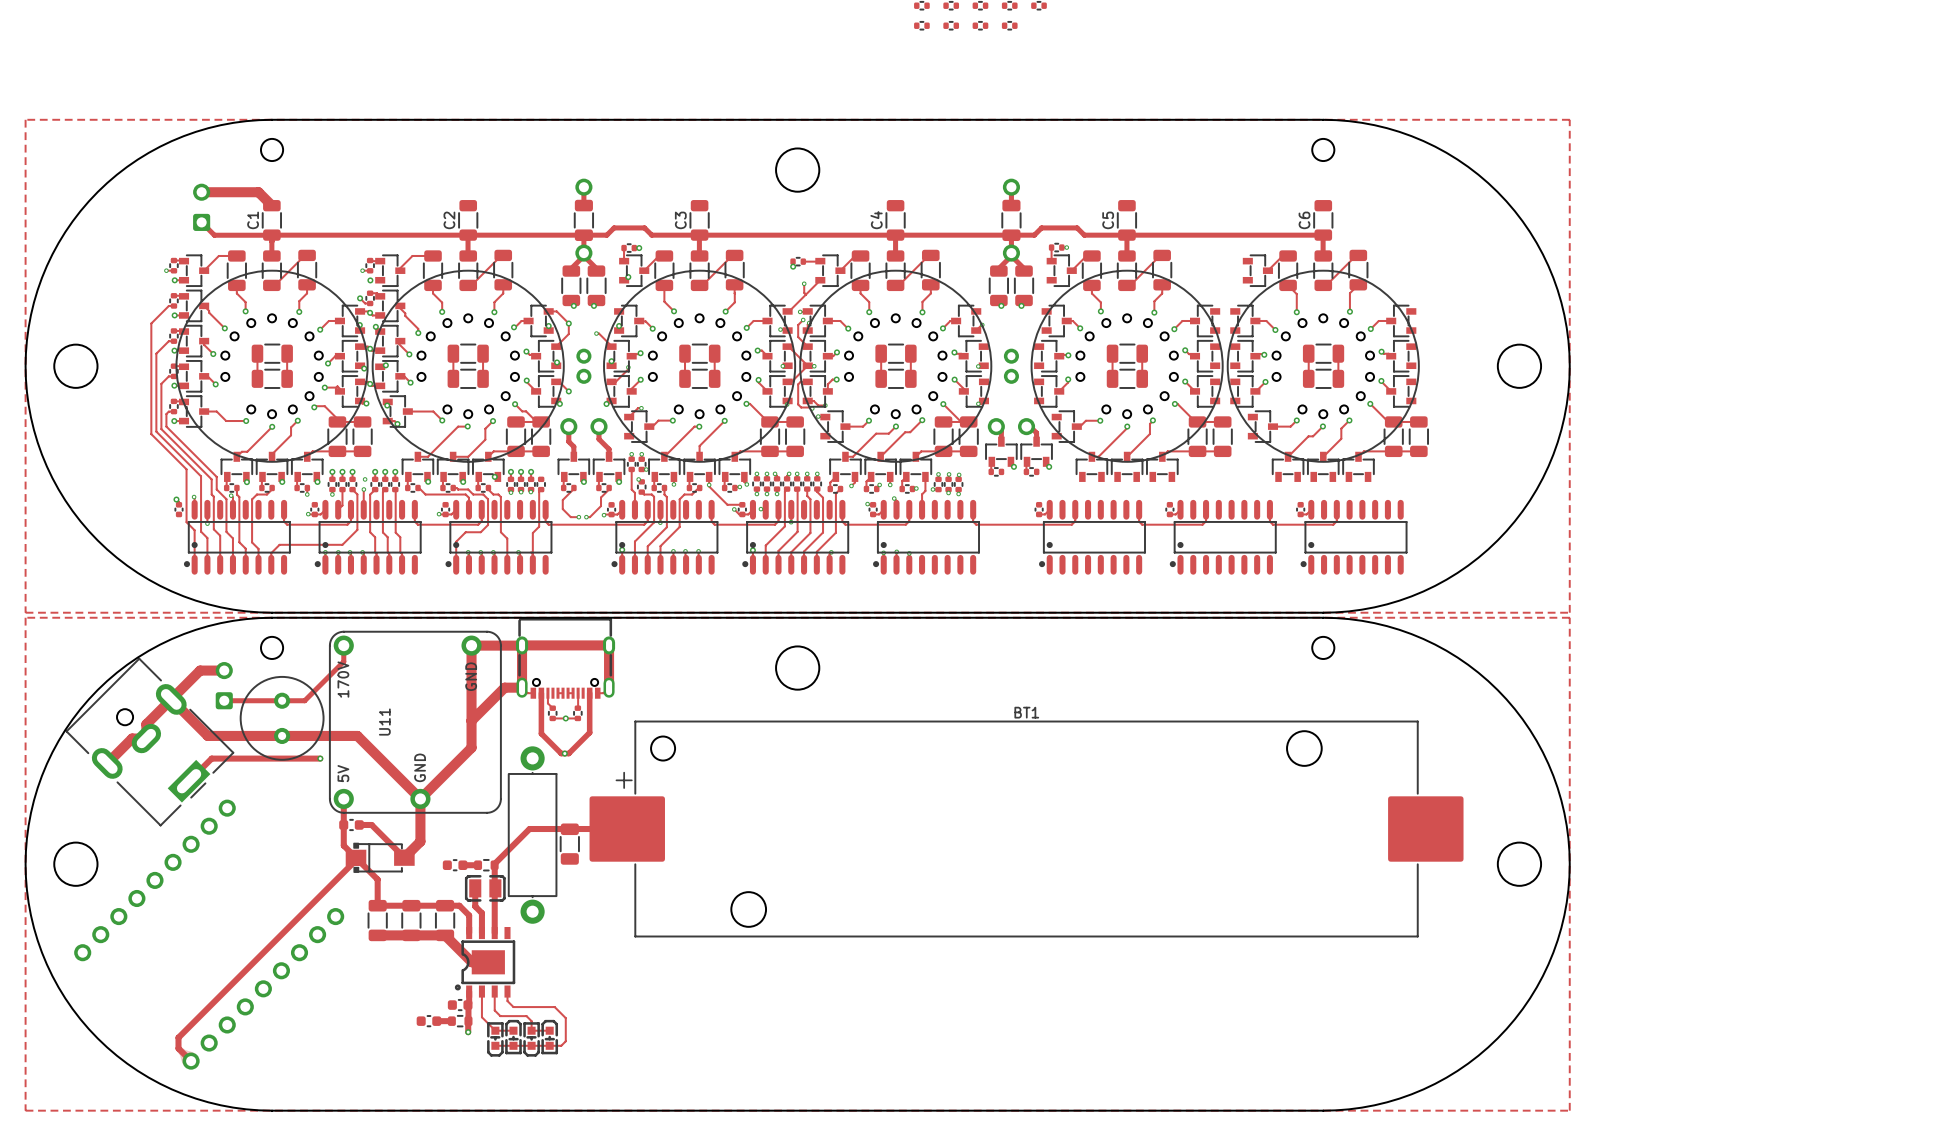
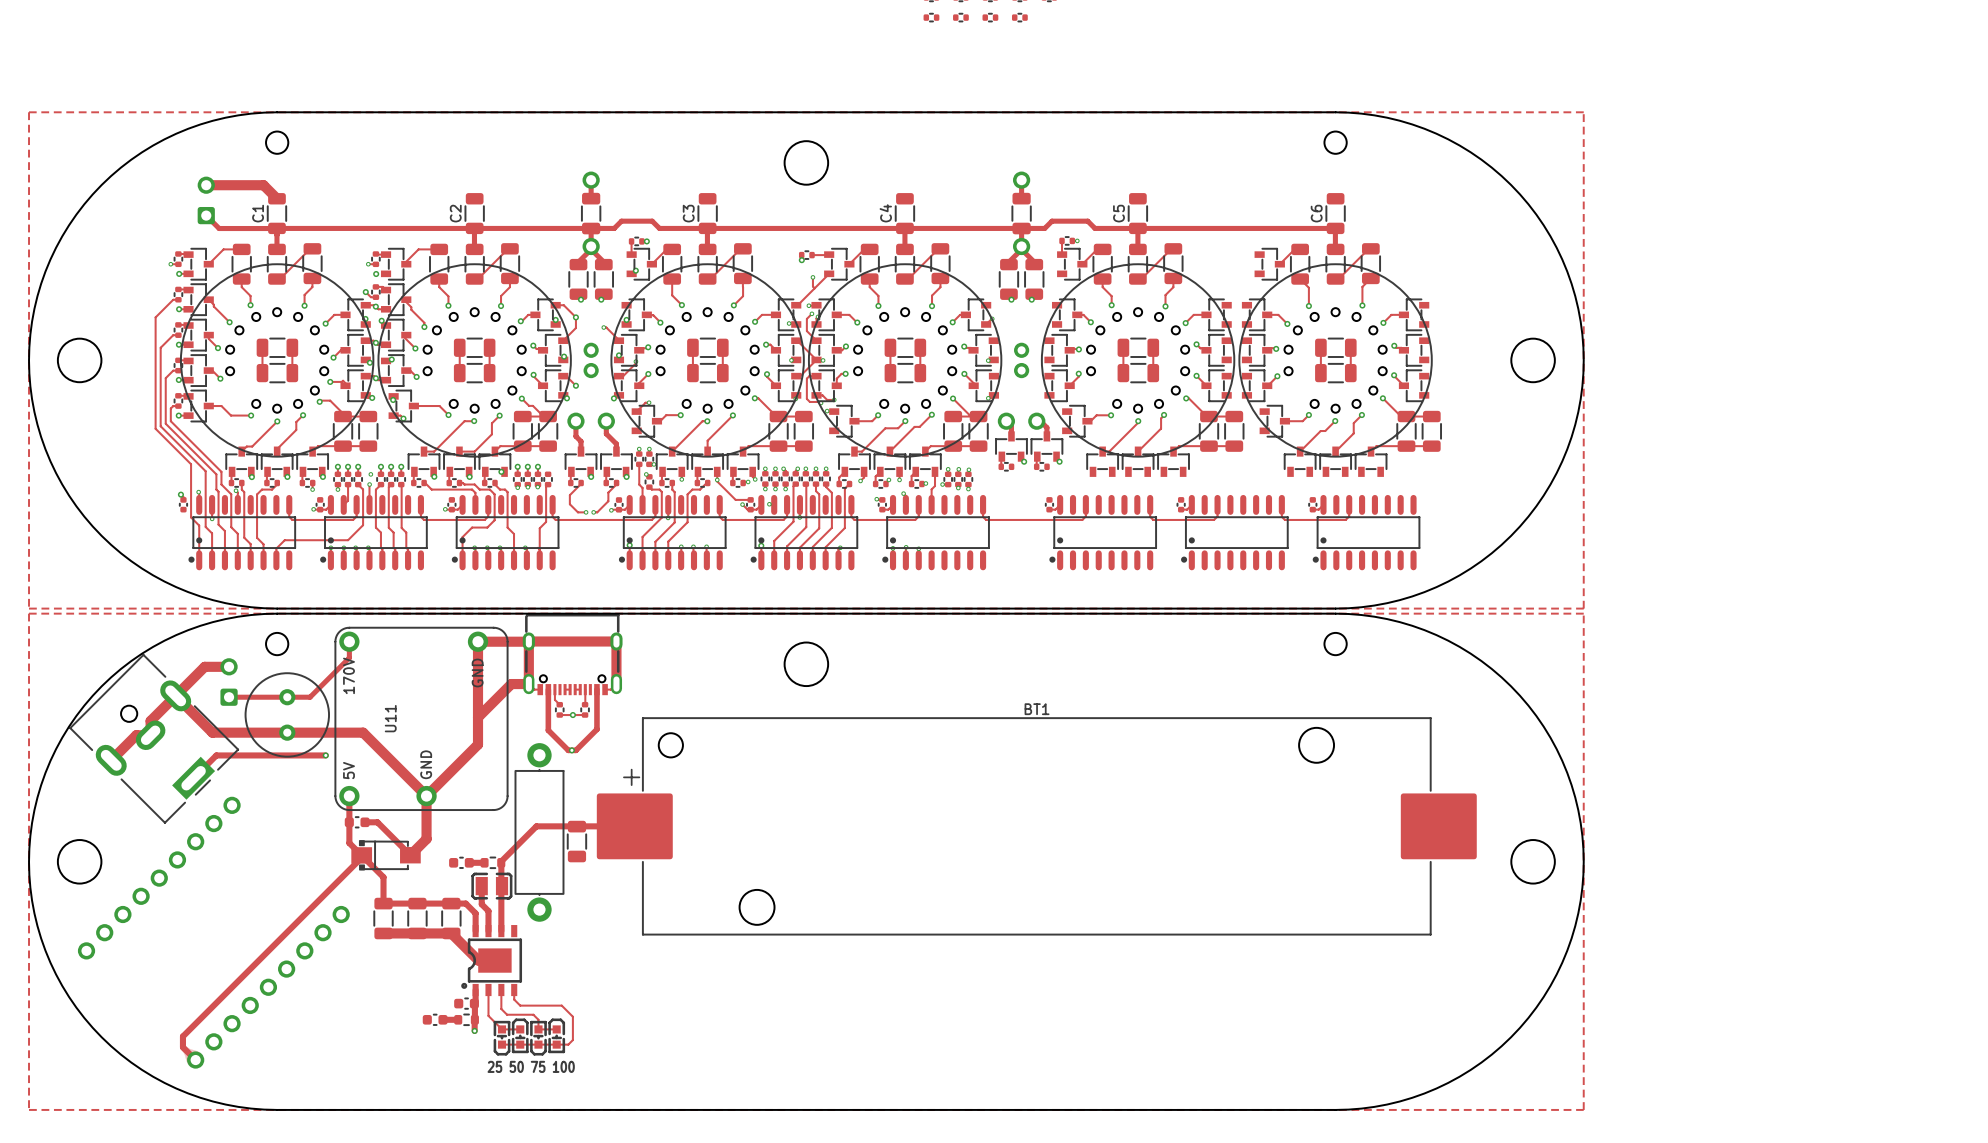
text: none -> 25 50 75 100 (531, 1066)

